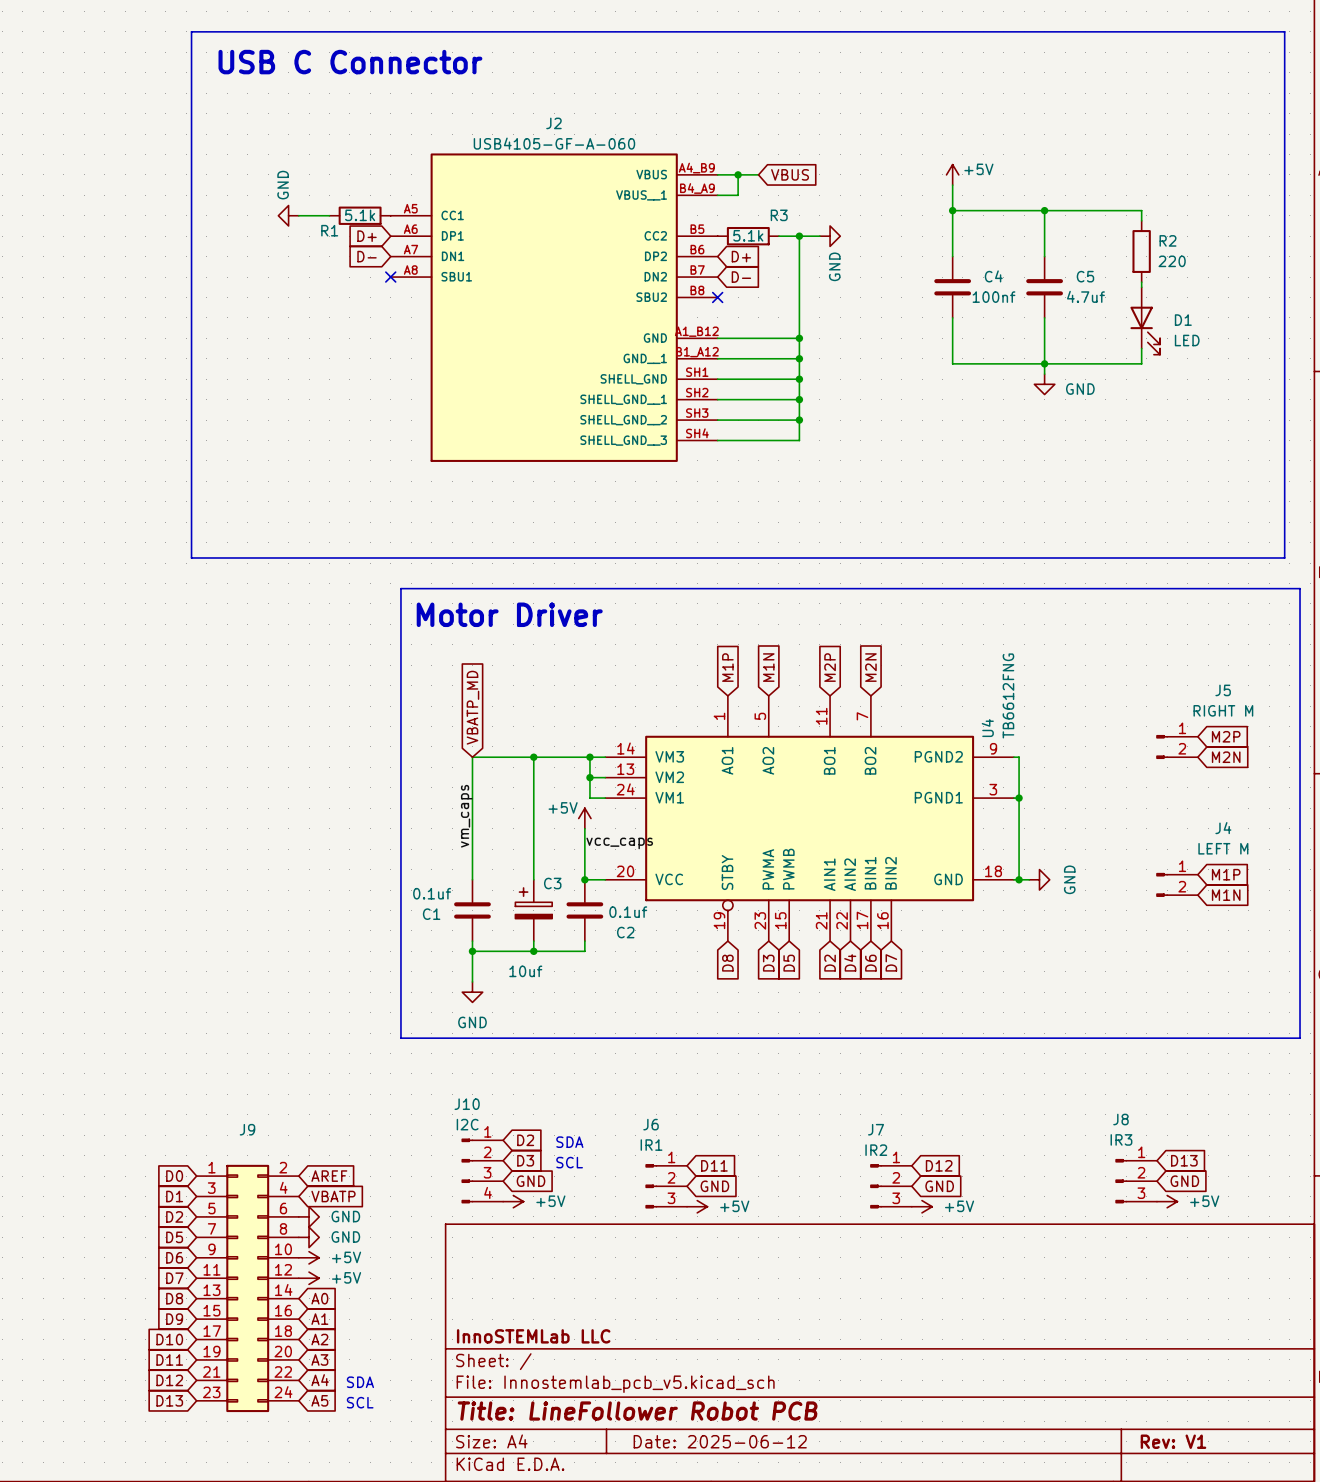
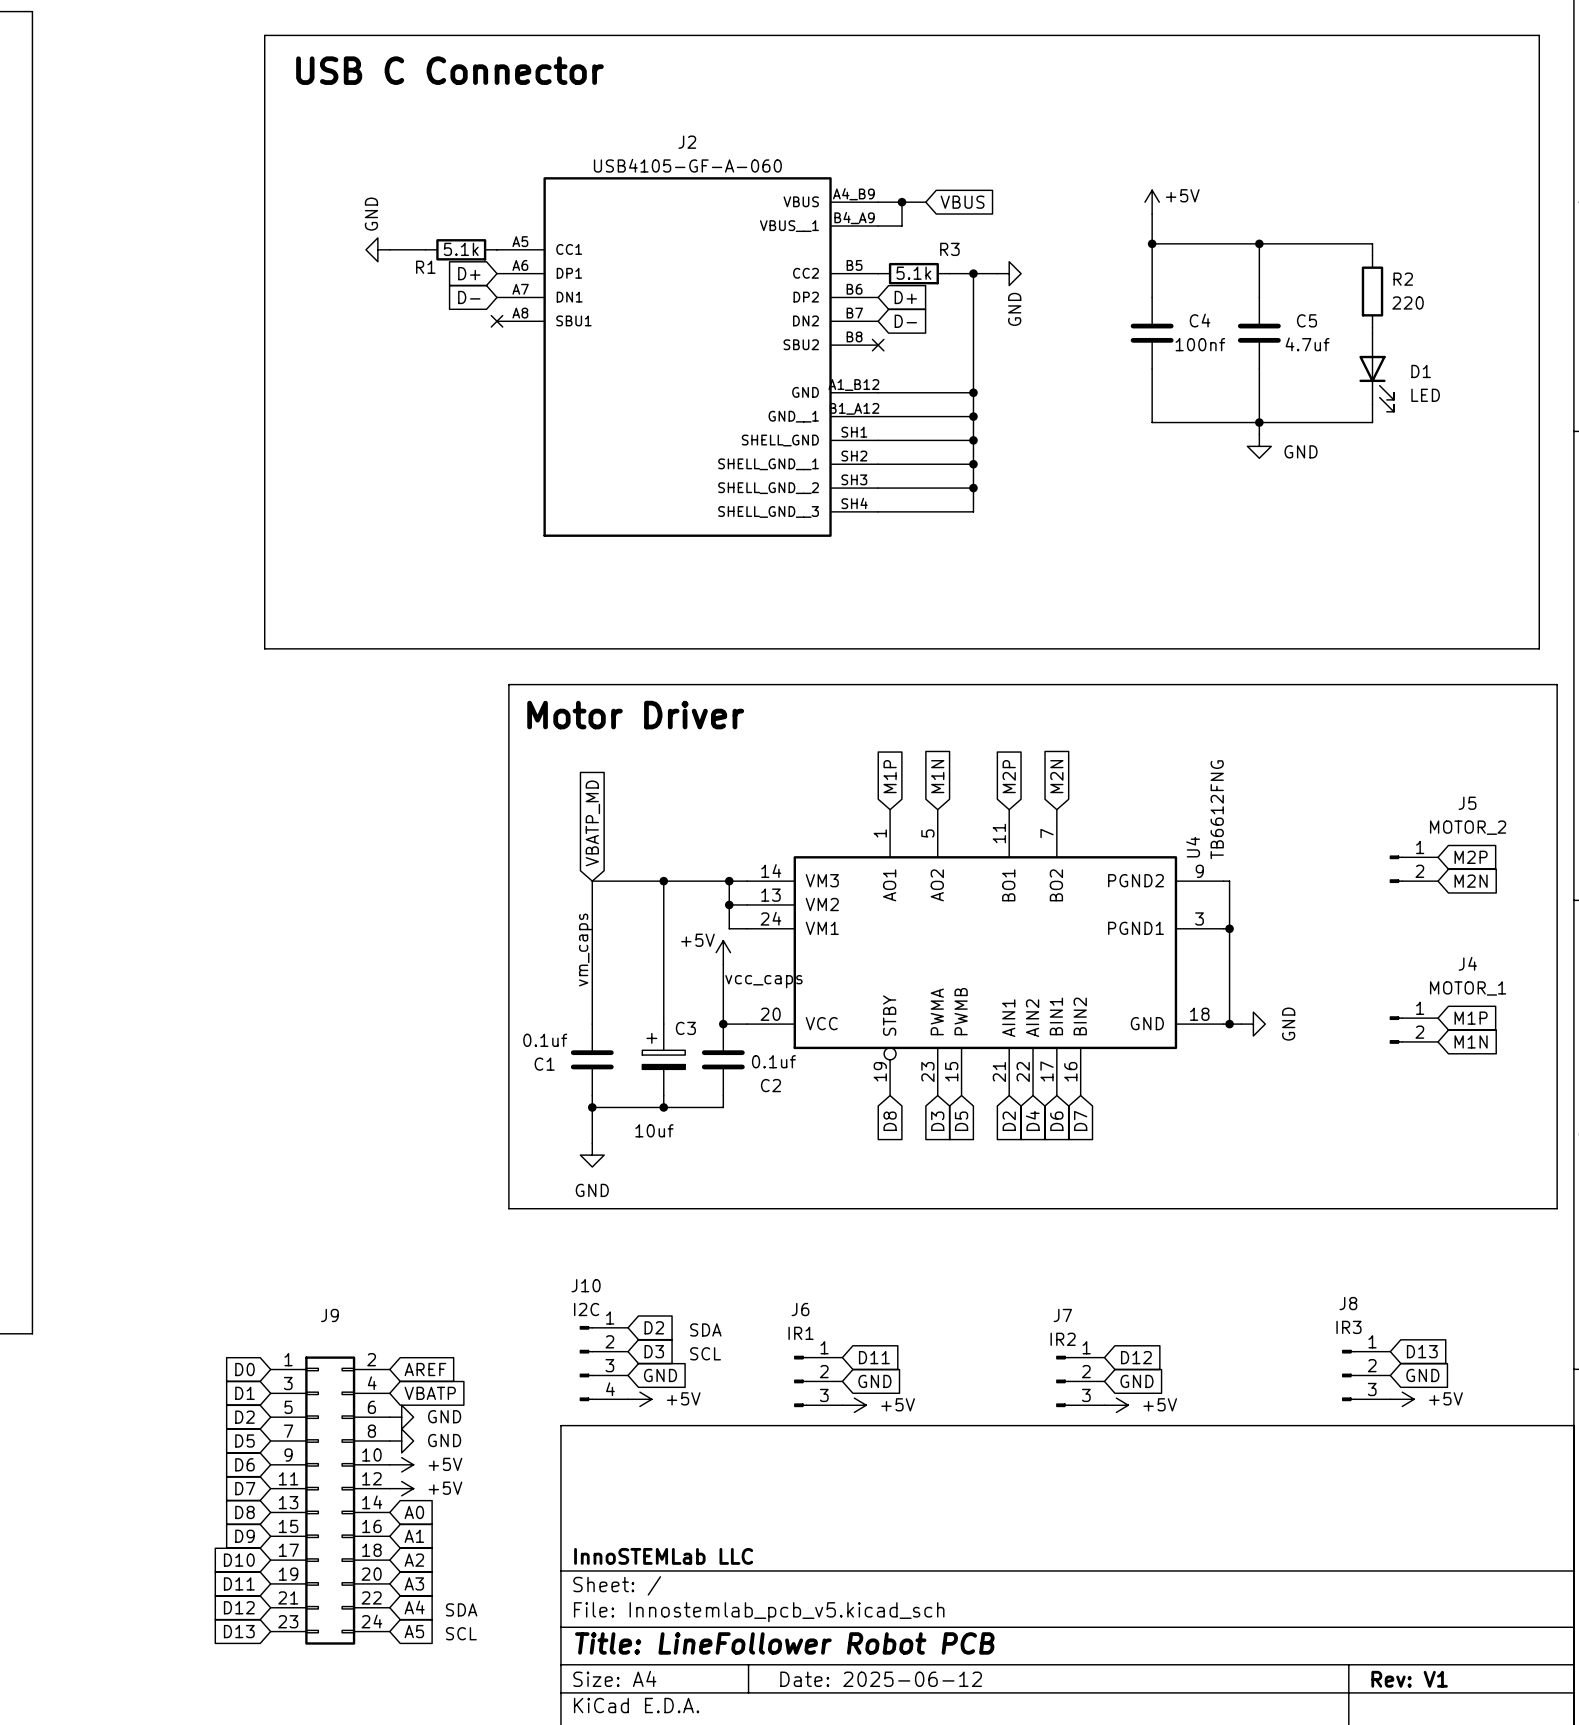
J5 value: RIGHT M (1223, 710) -> MOTOR_2 (1468, 827)
J4 value: LEFT M (1223, 848) -> MOTOR_1 (1468, 988)

